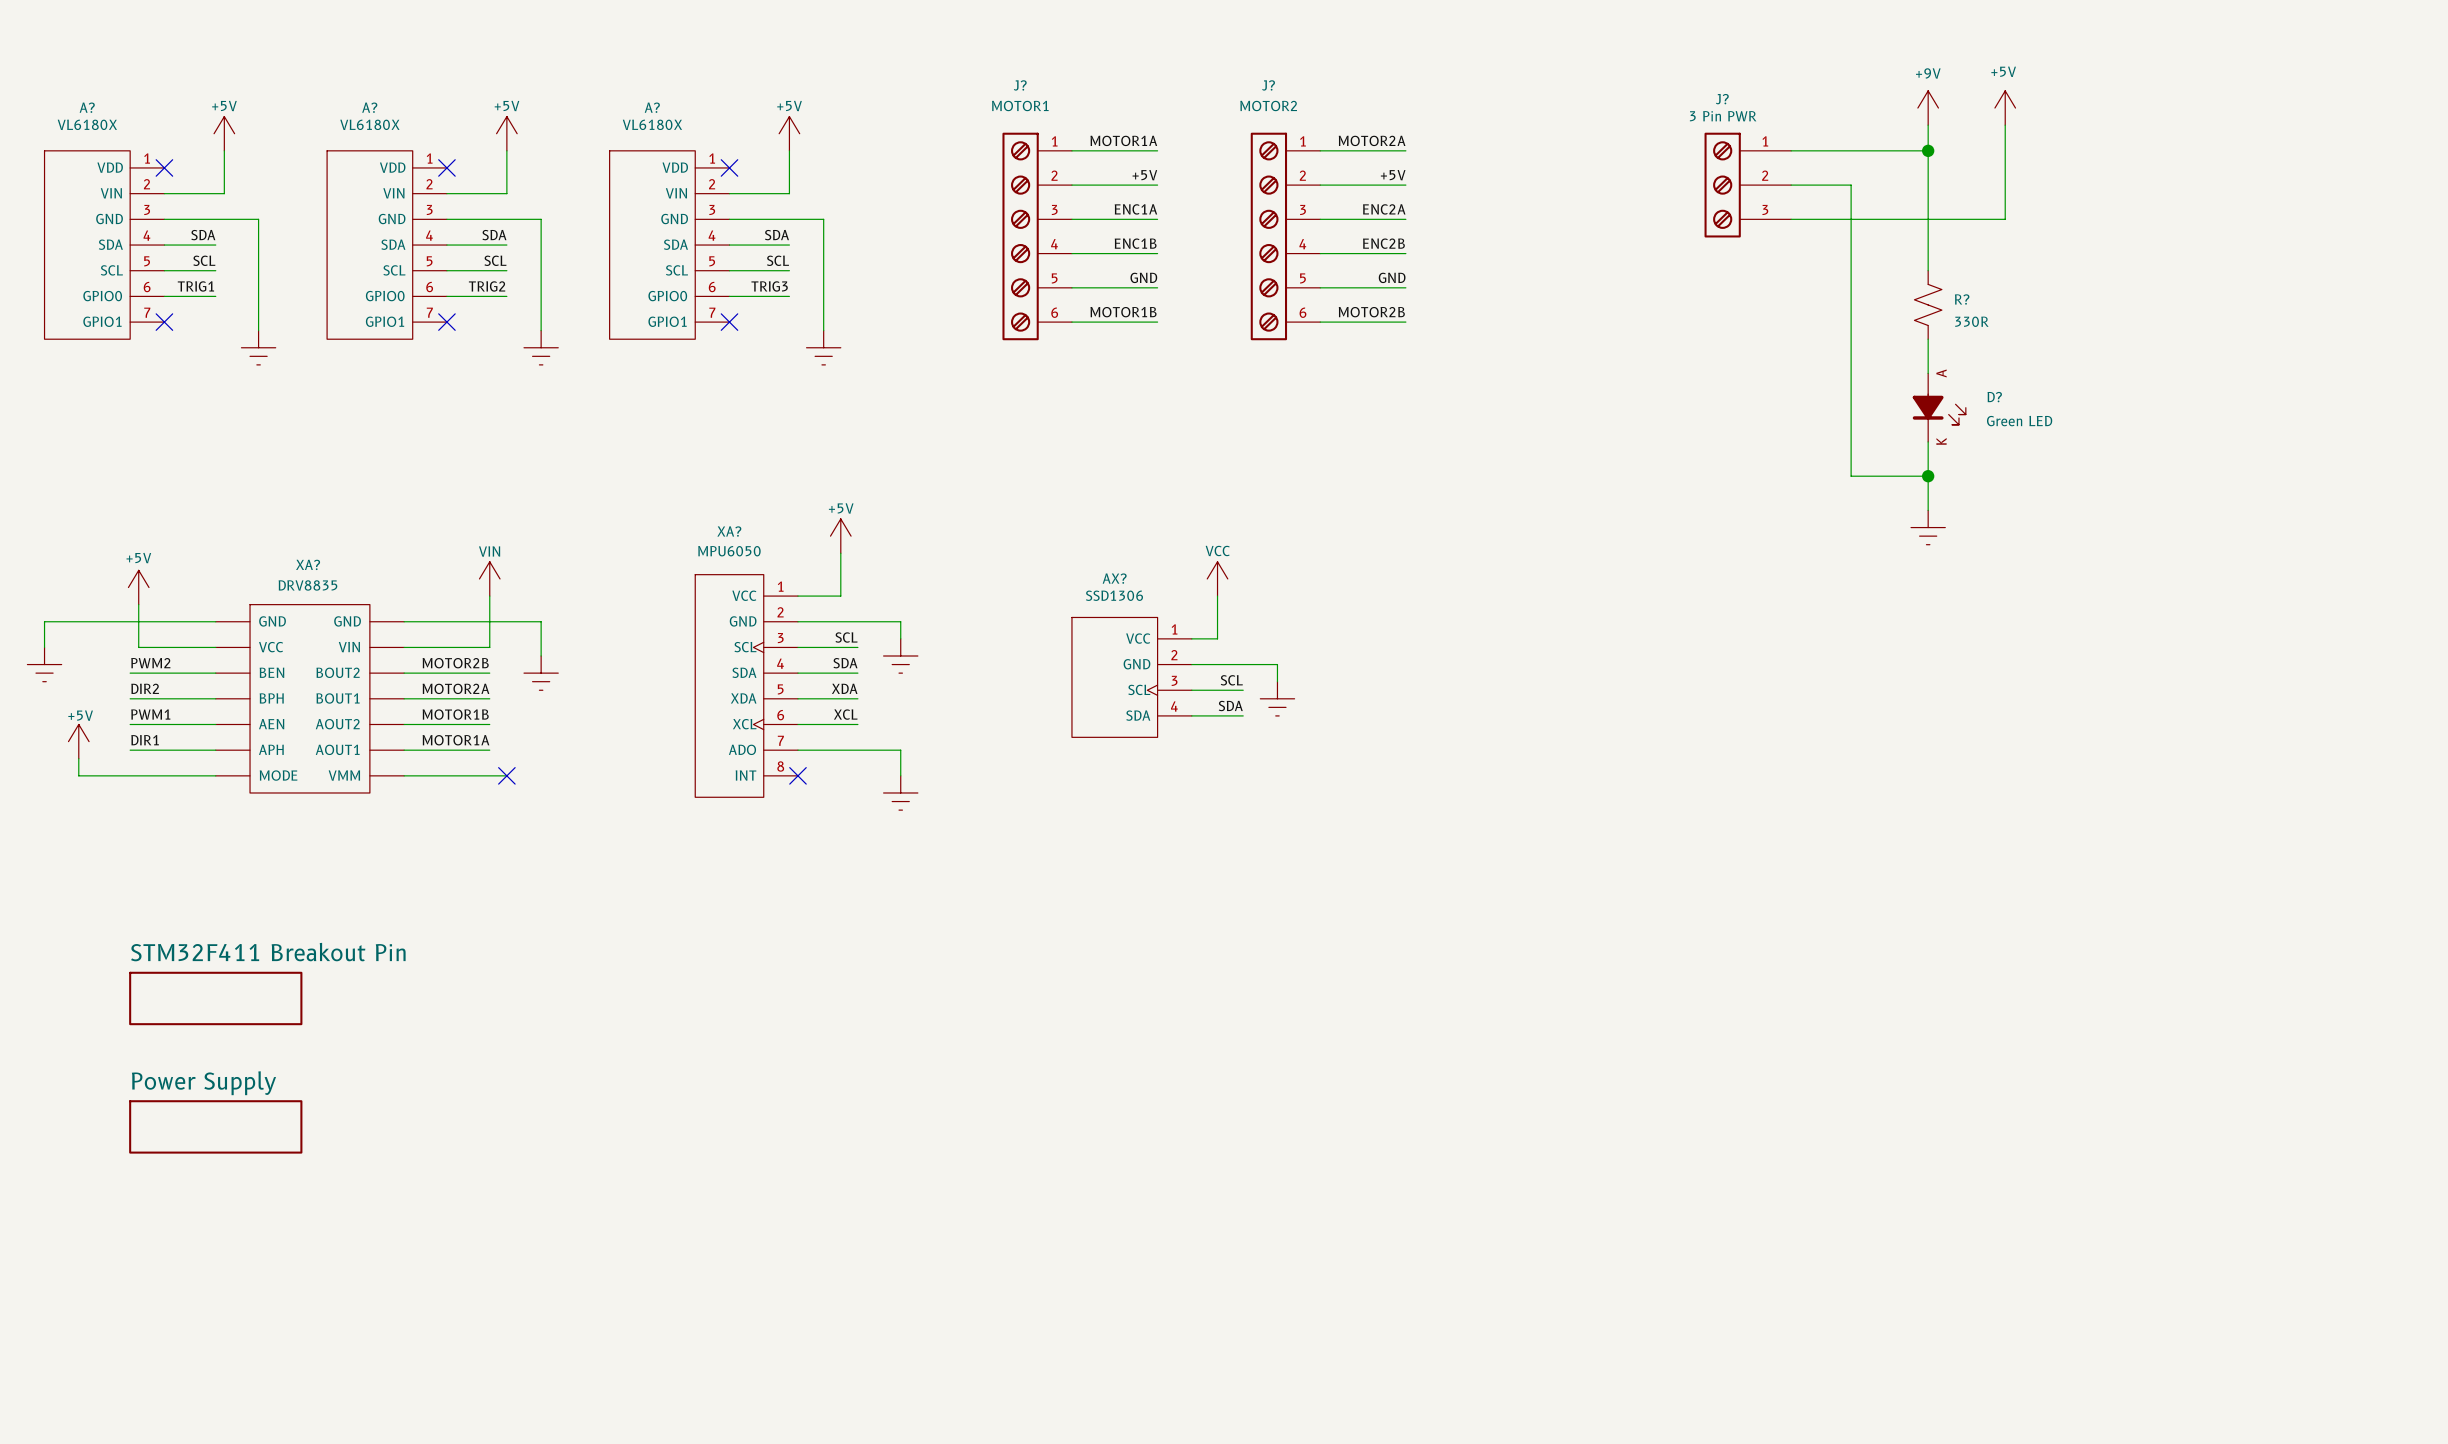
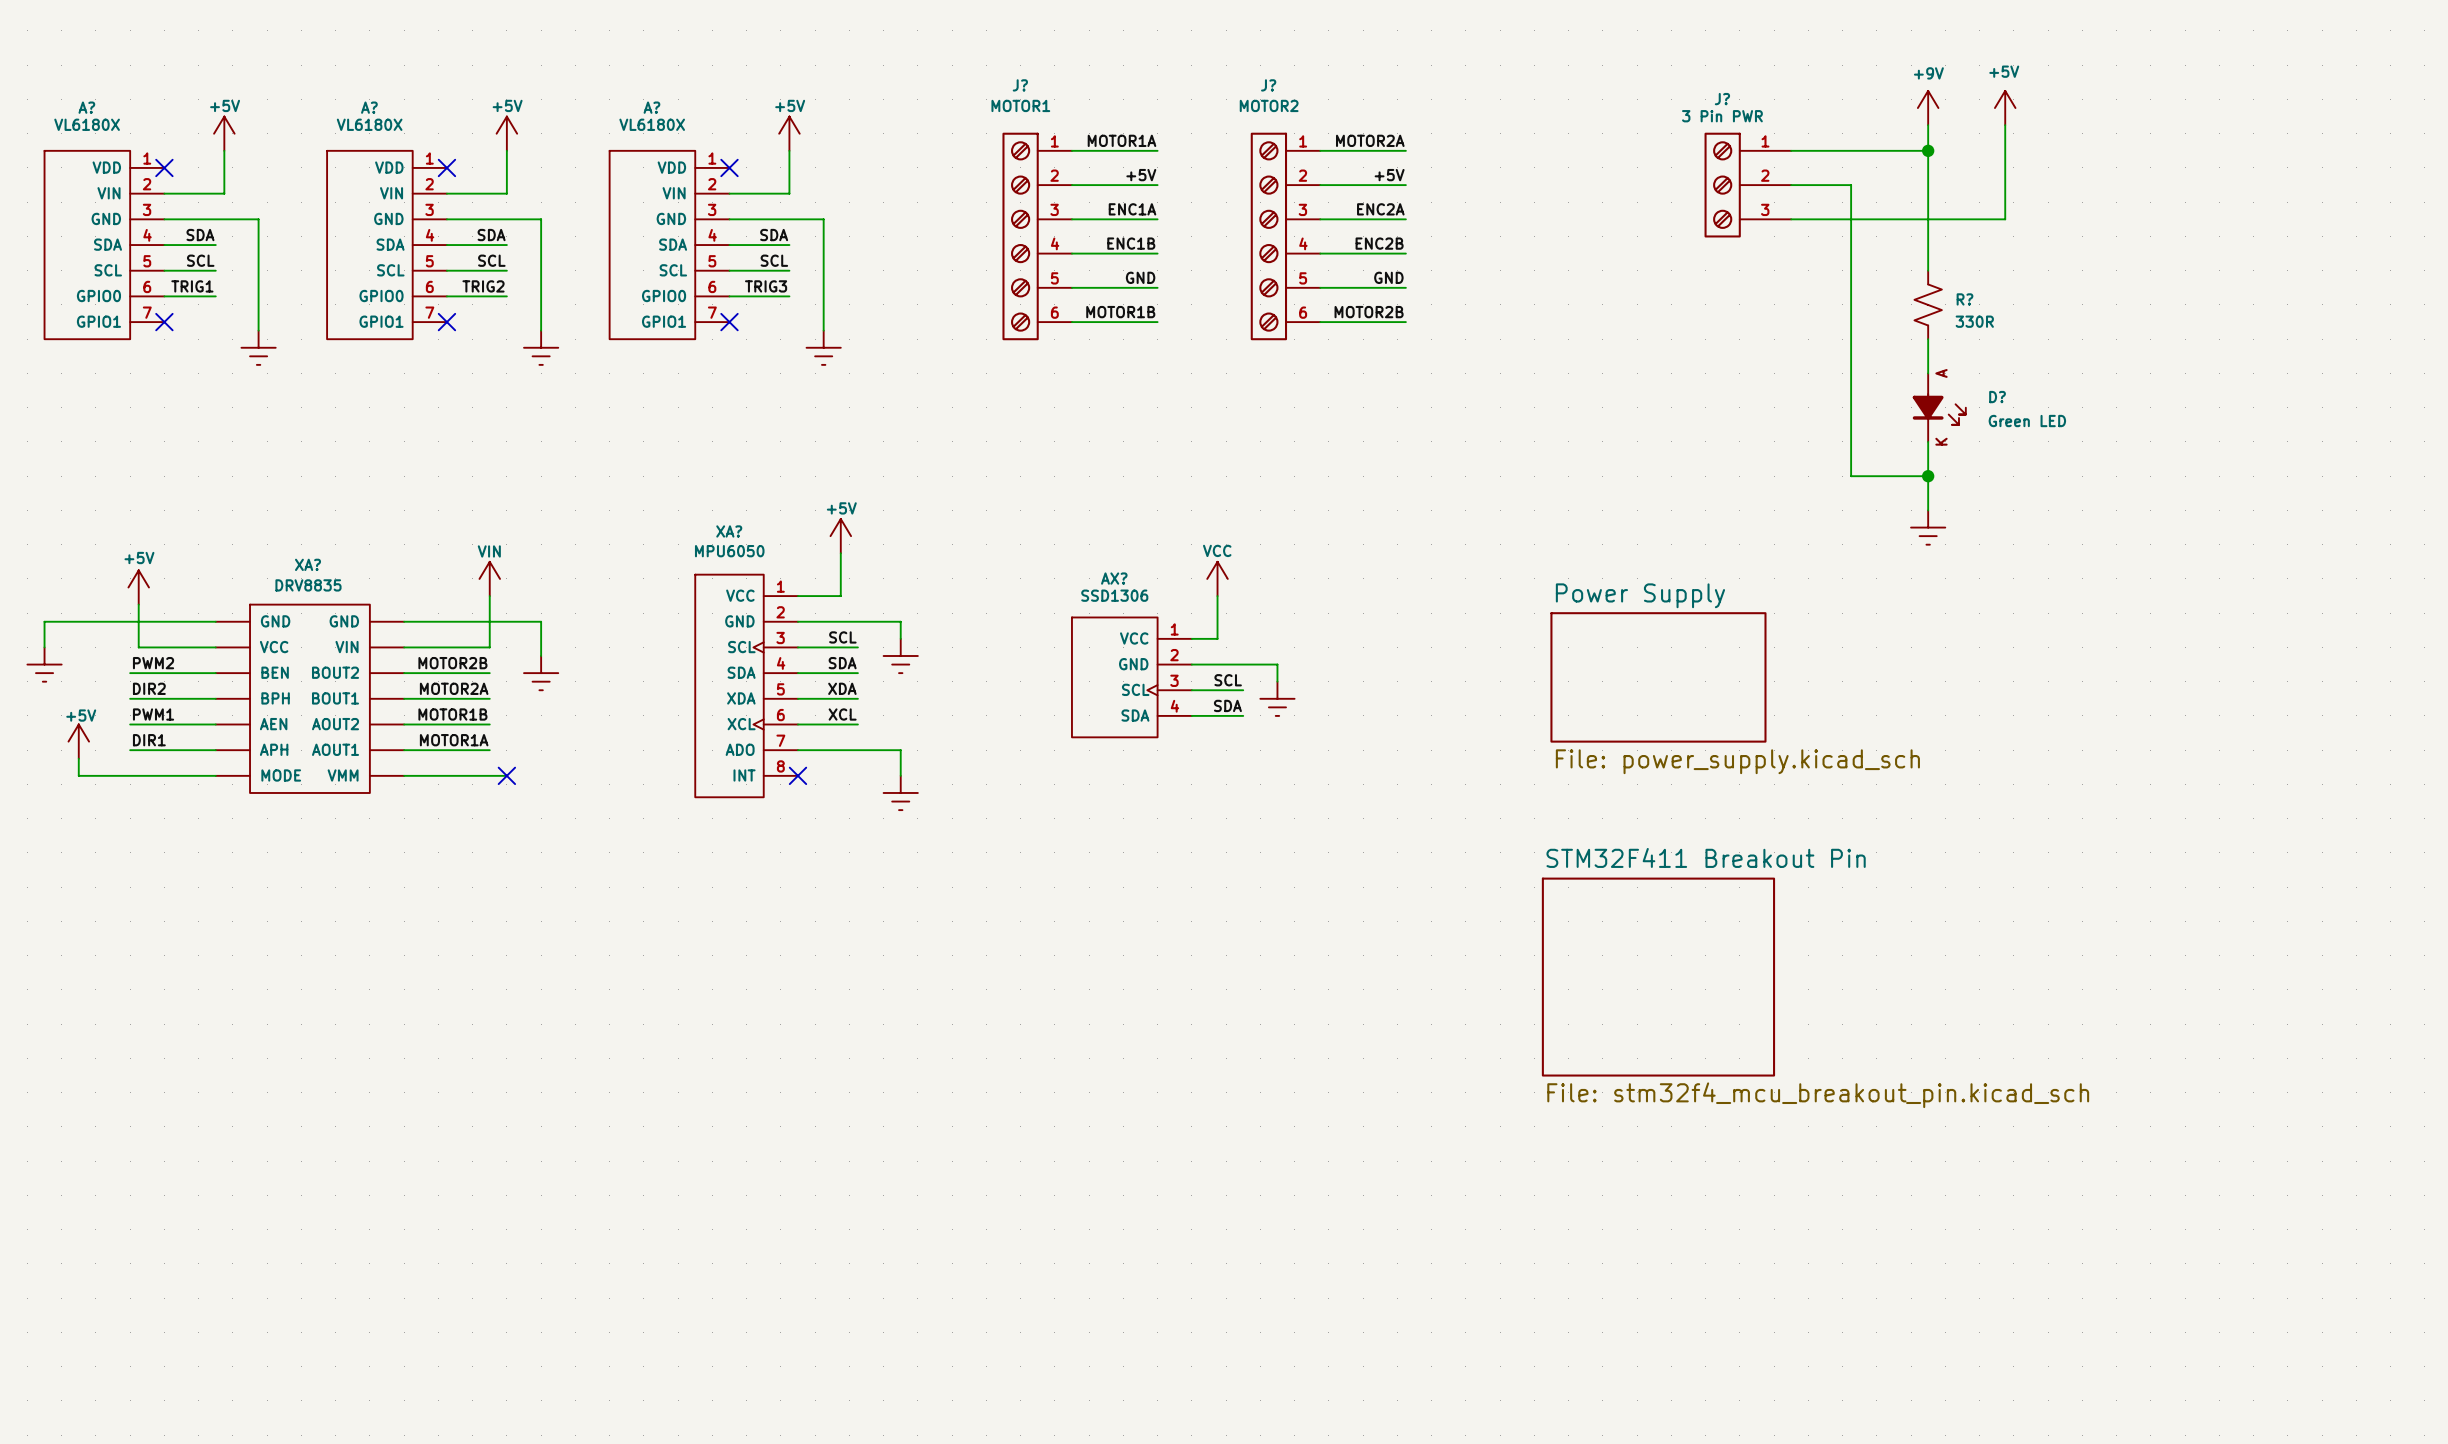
sheet Power Supply: none -> File: power_supply.kicad_sch (1658, 677)
sheet STM32F411 Breakout Pin name position: STM32F411 Breakout Pin (268, 952) -> STM32F411 Breakout Pin (1706, 857)
sheet STM32F411 Breakout Pin shape: [129, 971, 303, 1026] -> [1541, 877, 1776, 1077]
sheet STM32F411 Breakout Pin value: none -> File: stm32f4_mcu_breakout_pin.kicad_sch (1818, 1095)
sheet Power Supply: (215, 1126) -> none

